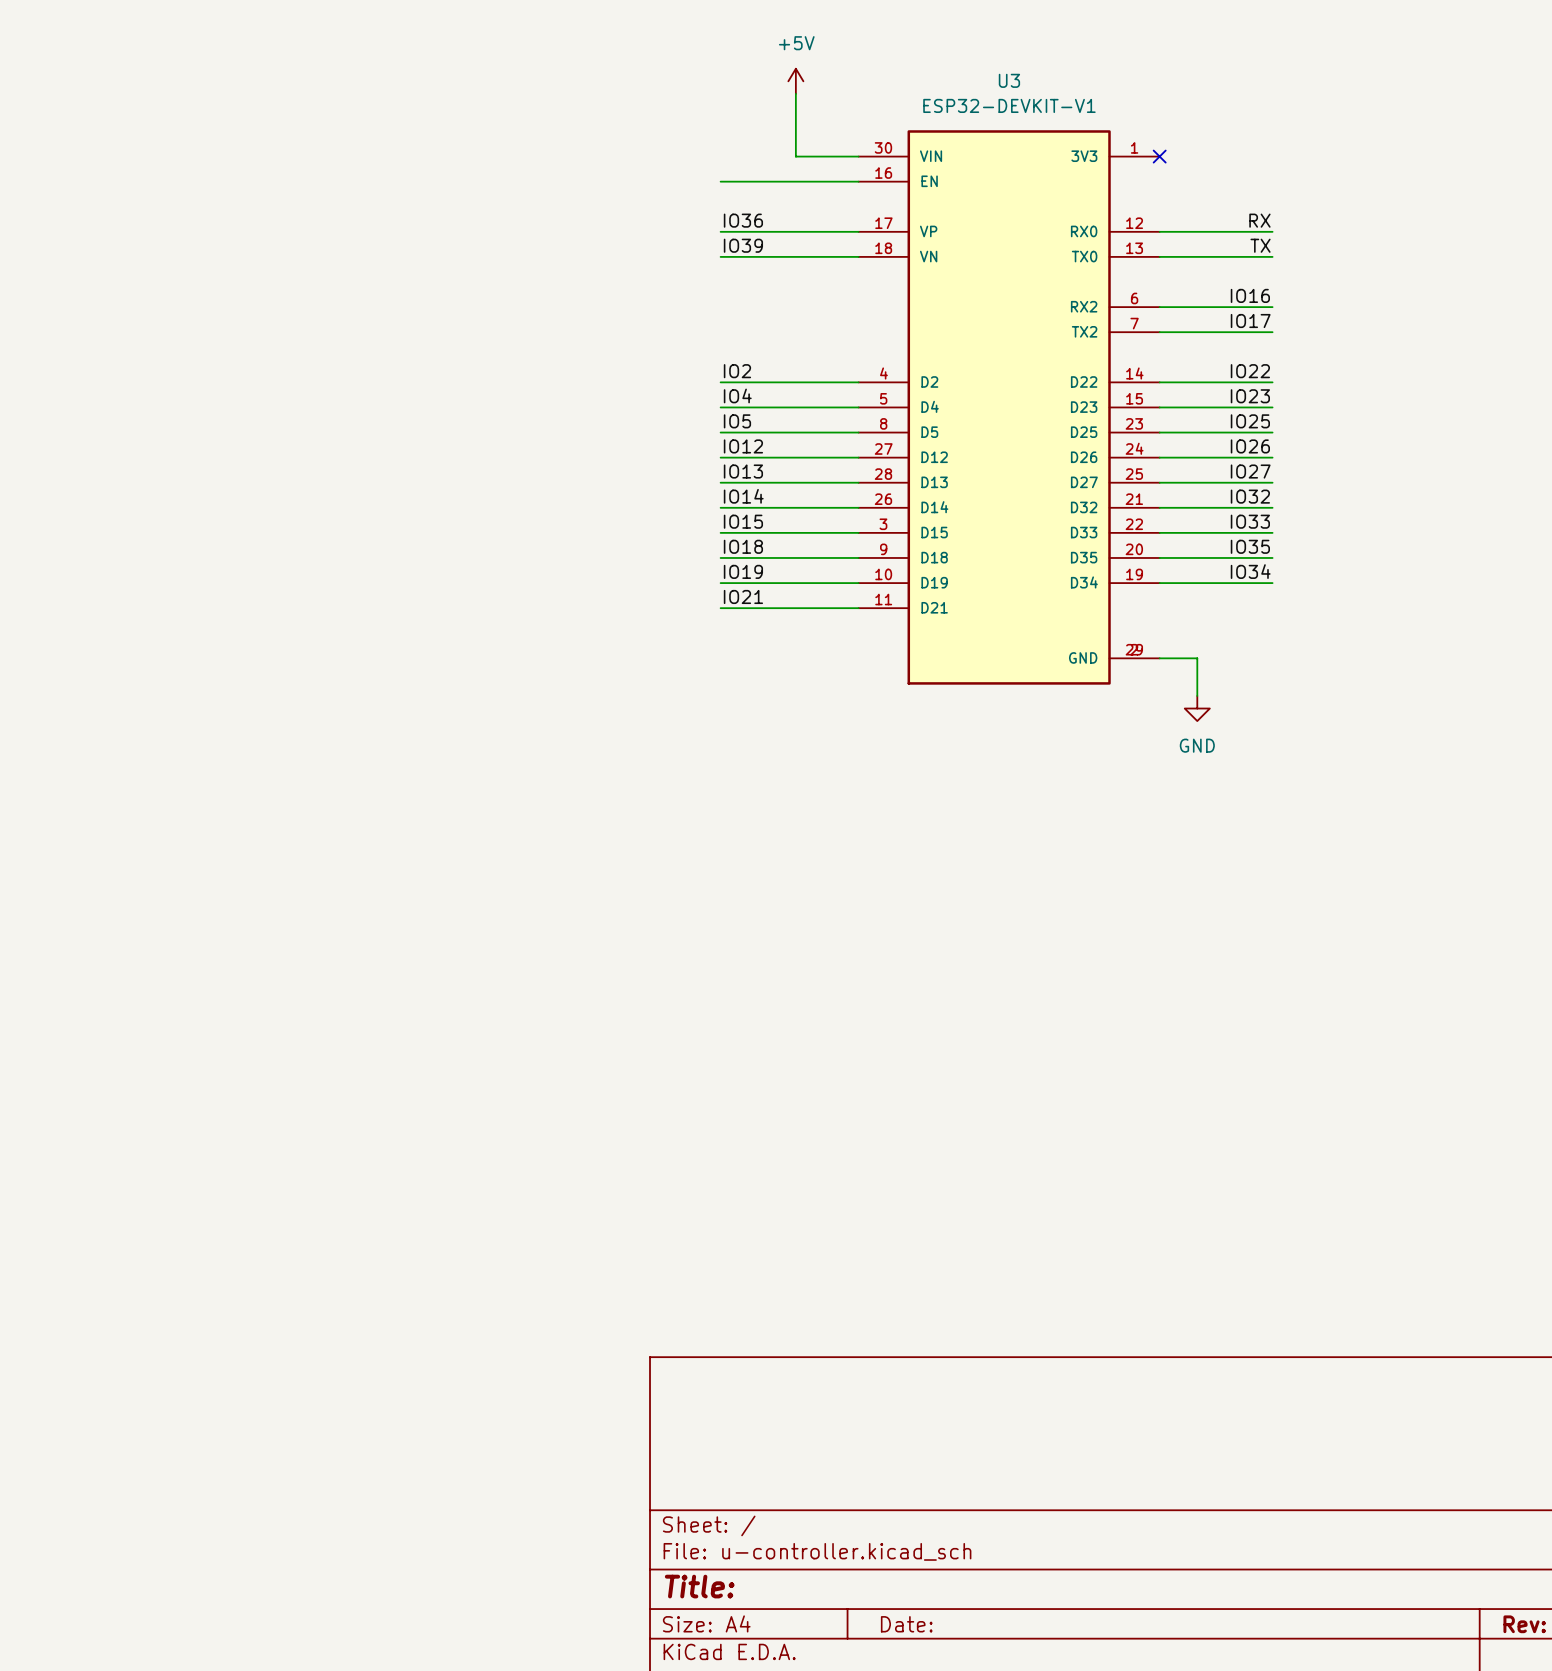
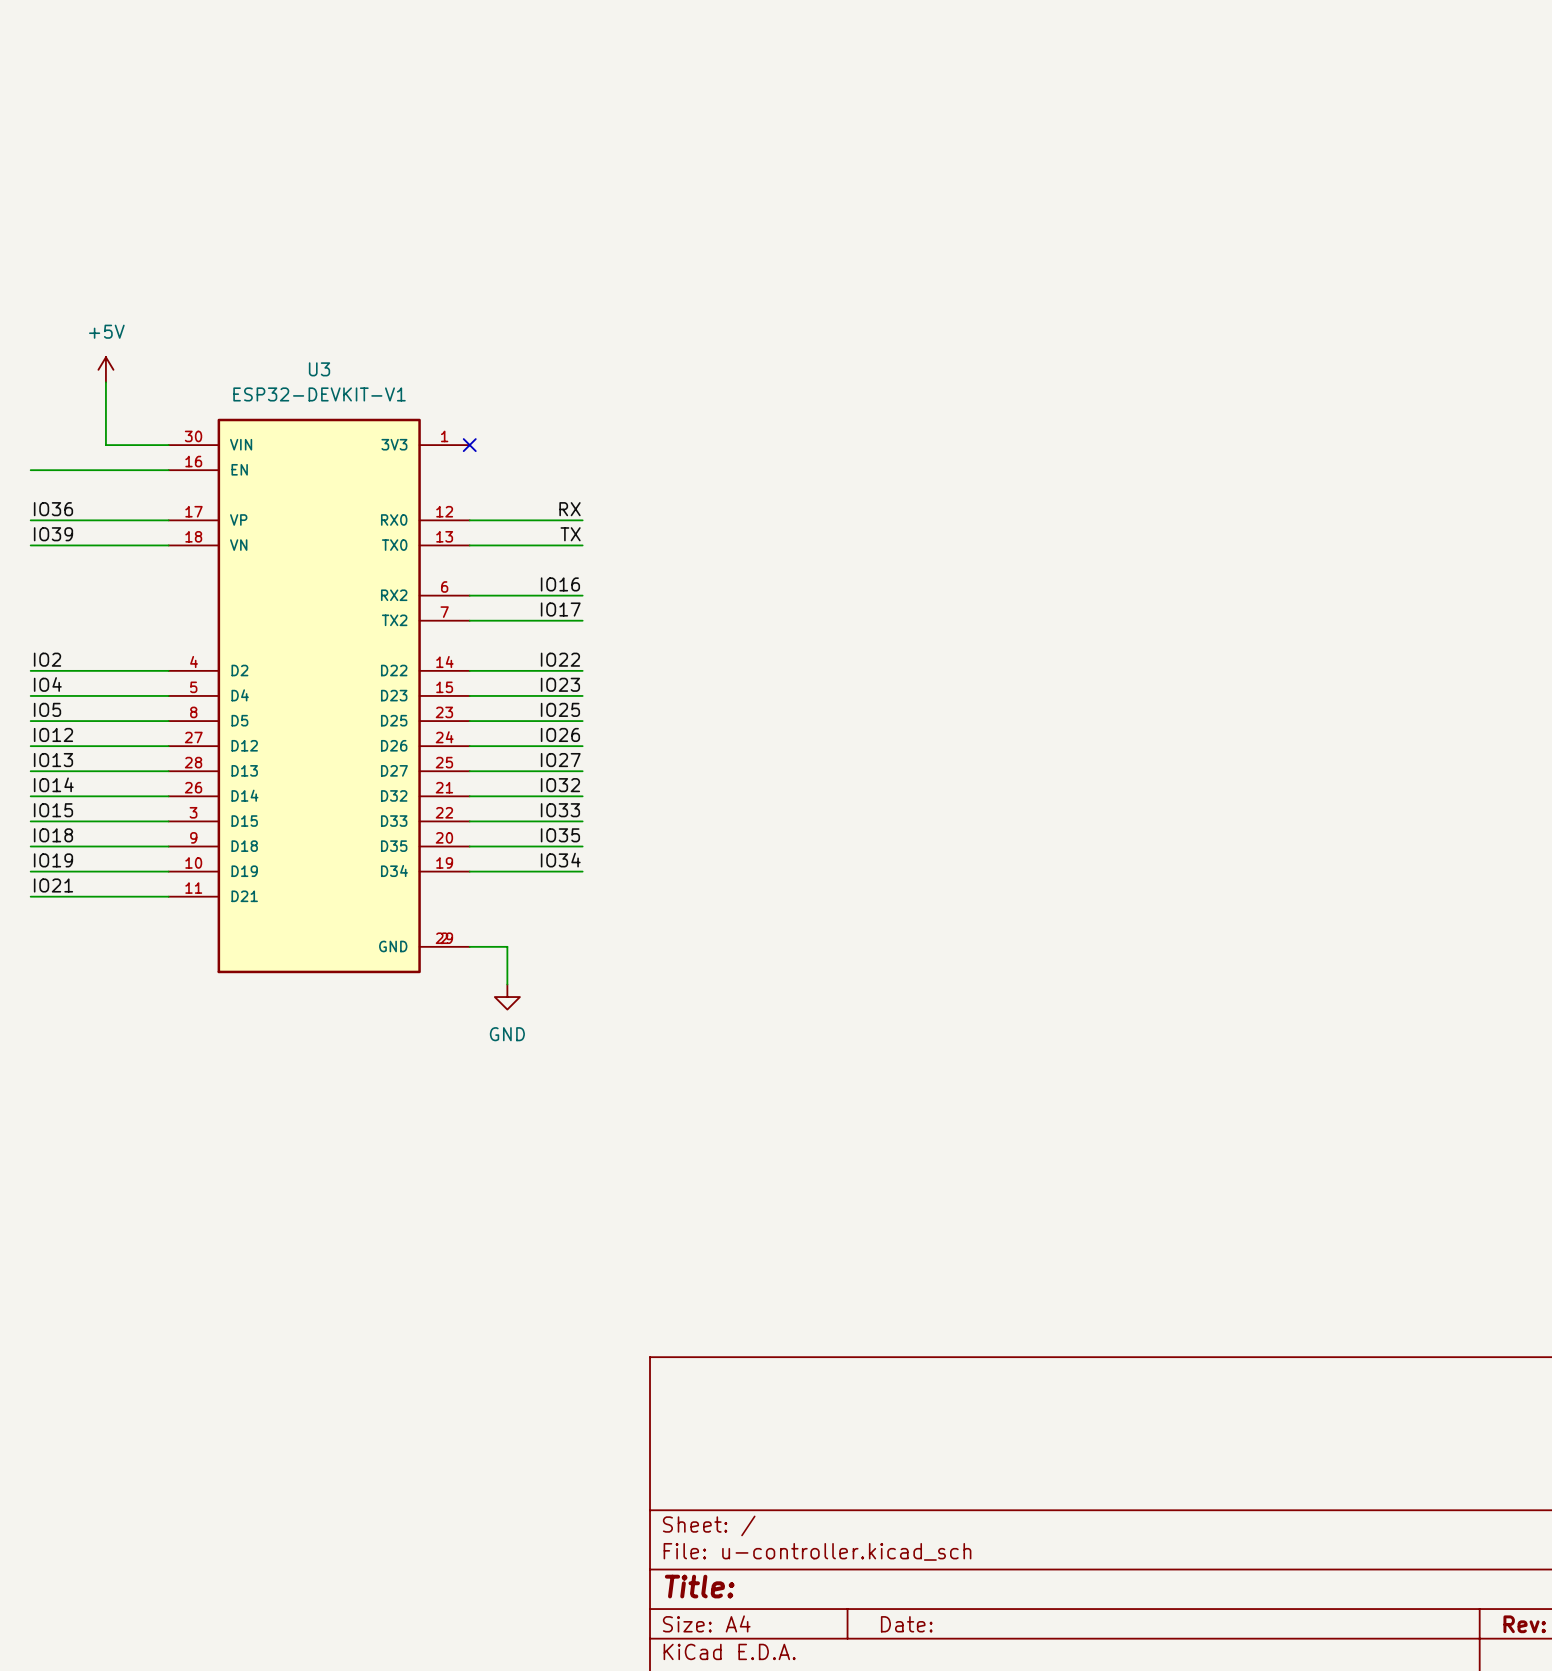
power symbol: +5V (795, 81) -> none
wire: (795, 93) (795, 156) (858, 156) -> none
no-connect mark: (1159, 156) -> none
wire: (720, 181) (858, 181) -> none
label: IO36 (743, 220) -> none
label: RX (1259, 220) -> none
wire: (720, 231) (858, 231) -> none
wire: (1159, 231) (1272, 231) -> none
label: IO39 (743, 245) -> none
label: TX (1260, 245) -> none
wire: (720, 256) (858, 256) -> none
wire: (1159, 256) (1272, 256) -> none
label: IO16 (1250, 295) -> none
wire: (1159, 307) (1272, 307) -> none
label: IO17 (1250, 321) -> none
wire: (1159, 332) (1272, 332) -> none
power symbol: none -> +5V (105, 369)
label: IO2 (737, 371) -> none
label: IO22 (1250, 371) -> none
wire: none -> (105, 382) (105, 445) (168, 445)
wire: (720, 382) (858, 382) -> none
wire: (1159, 382) (1272, 382) -> none
label: IO4 (737, 395) -> none
label: IO23 (1250, 396) -> none
wire: (720, 407) (858, 407) -> none
U3 position: (1009, 407) -> (319, 695)
wire: (1159, 407) (1272, 407) -> none
label: IO5 (737, 421) -> none
label: IO25 (1250, 421) -> none
wire: (720, 432) (858, 432) -> none
wire: (1159, 432) (1272, 432) -> none
no-connect mark: none -> (469, 445)
label: IO12 (743, 446) -> none
label: IO26 (1250, 446) -> none
wire: (720, 457) (858, 457) -> none
wire: (1159, 457) (1272, 457) -> none
wire: none -> (30, 470) (168, 470)
label: IO13 (743, 471) -> none
label: IO27 (1250, 471) -> none
wire: (720, 482) (858, 482) -> none
wire: (1159, 482) (1272, 482) -> none
label: IO14 (743, 496) -> none
label: IO32 (1250, 496) -> none
wire: (720, 507) (858, 507) -> none
wire: (1159, 507) (1272, 507) -> none
label: none -> IO36 (53, 509)
label: none -> RX (570, 509)
wire: none -> (30, 520) (168, 520)
wire: none -> (469, 520) (582, 520)
label: IO15 (743, 521) -> none
label: IO33 (1250, 521) -> none
wire: (720, 532) (858, 532) -> none
wire: (1159, 532) (1272, 532) -> none
label: none -> IO39 (53, 534)
label: none -> TX (570, 534)
wire: none -> (30, 545) (168, 545)
wire: none -> (469, 545) (582, 545)
label: IO18 (743, 546) -> none
label: IO35 (1250, 546) -> none
wire: (720, 557) (858, 557) -> none
wire: (1159, 557) (1272, 557) -> none
label: IO19 (743, 571) -> none
label: IO34 (1250, 571) -> none
wire: (720, 583) (858, 583) -> none
wire: (1159, 583) (1272, 583) -> none
label: none -> IO16 (560, 584)
wire: none -> (469, 595) (582, 595)
label: IO21 (743, 596) -> none
wire: (720, 608) (858, 608) -> none
label: none -> IO17 (560, 609)
wire: none -> (469, 620) (582, 620)
wire: (1159, 658) (1197, 658) (1197, 695) -> none
label: none -> IO2 (47, 659)
label: none -> IO22 (560, 659)
wire: none -> (30, 670) (168, 670)
wire: none -> (469, 670) (582, 670)
label: none -> IO4 (47, 684)
label: none -> IO23 (560, 684)
wire: none -> (30, 695) (168, 695)
wire: none -> (469, 695) (582, 695)
power symbol: GND (1197, 708) -> none
label: none -> IO5 (47, 709)
label: none -> IO25 (560, 709)
wire: none -> (30, 721) (168, 721)
wire: none -> (469, 721) (582, 721)
label: none -> IO12 (53, 734)
label: none -> IO26 (560, 734)
wire: none -> (30, 746) (168, 746)
wire: none -> (469, 746) (582, 746)
label: none -> IO13 (53, 760)
label: none -> IO27 (560, 760)
wire: none -> (30, 771) (168, 771)
wire: none -> (469, 771) (582, 771)
label: none -> IO14 (53, 784)
label: none -> IO32 (560, 785)
wire: none -> (30, 796) (168, 796)
wire: none -> (469, 796) (582, 796)
label: none -> IO15 (53, 810)
label: none -> IO33 (560, 810)
wire: none -> (30, 821) (168, 821)
wire: none -> (469, 821) (582, 821)
label: none -> IO18 (53, 835)
label: none -> IO35 (560, 835)
wire: none -> (30, 846) (168, 846)
wire: none -> (469, 846) (582, 846)
label: none -> IO19 (53, 860)
label: none -> IO34 (560, 860)
wire: none -> (30, 871) (168, 871)
wire: none -> (469, 871) (582, 871)
label: none -> IO21 (53, 885)
wire: none -> (30, 896) (168, 896)
wire: none -> (469, 946) (507, 946) (507, 984)
power symbol: none -> GND (507, 997)

